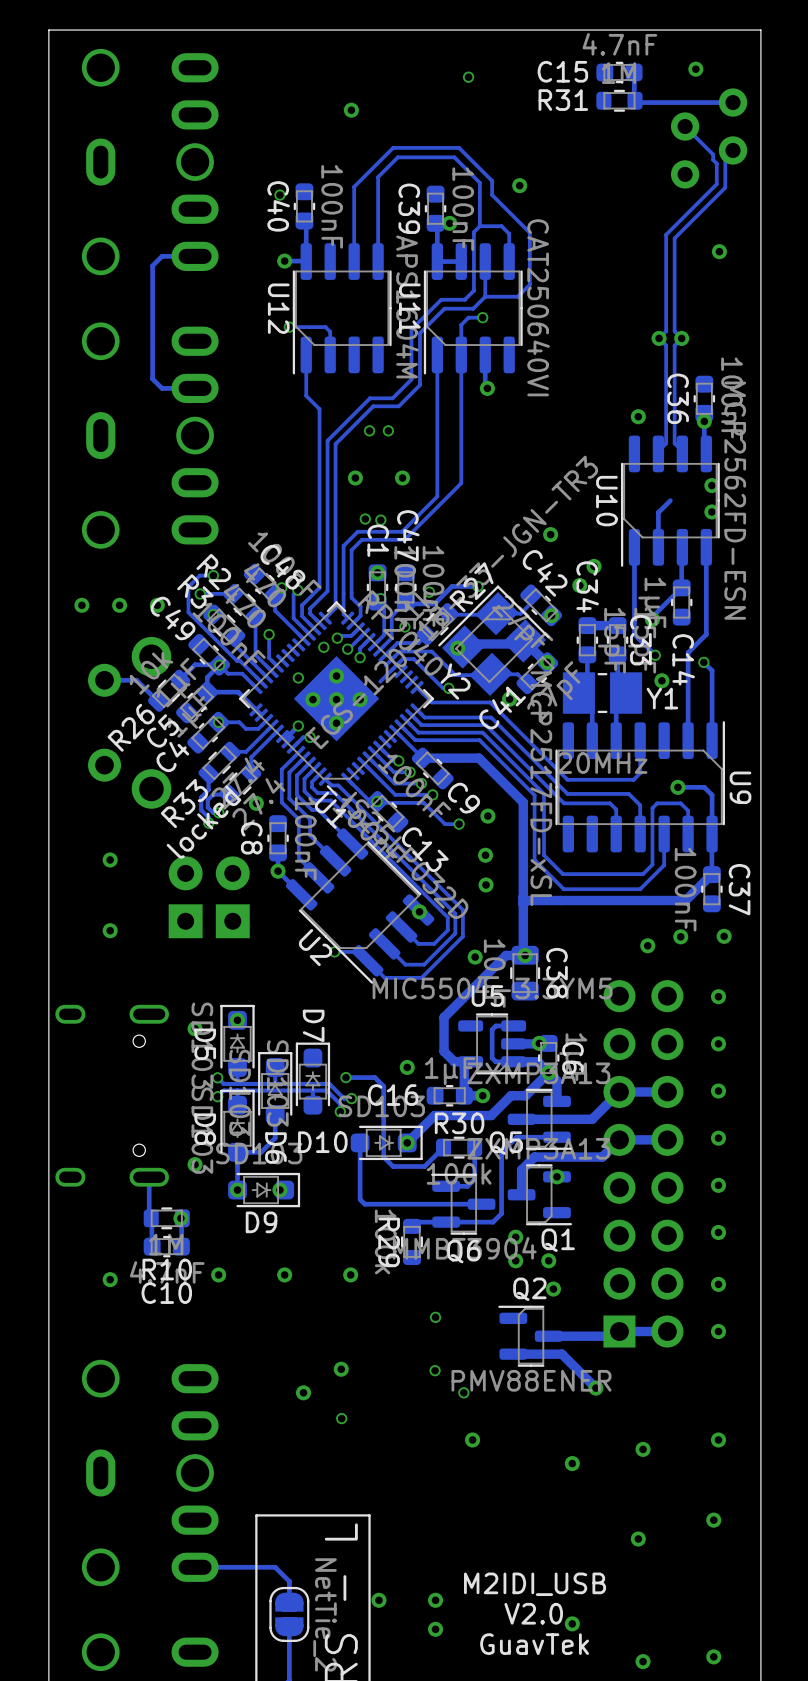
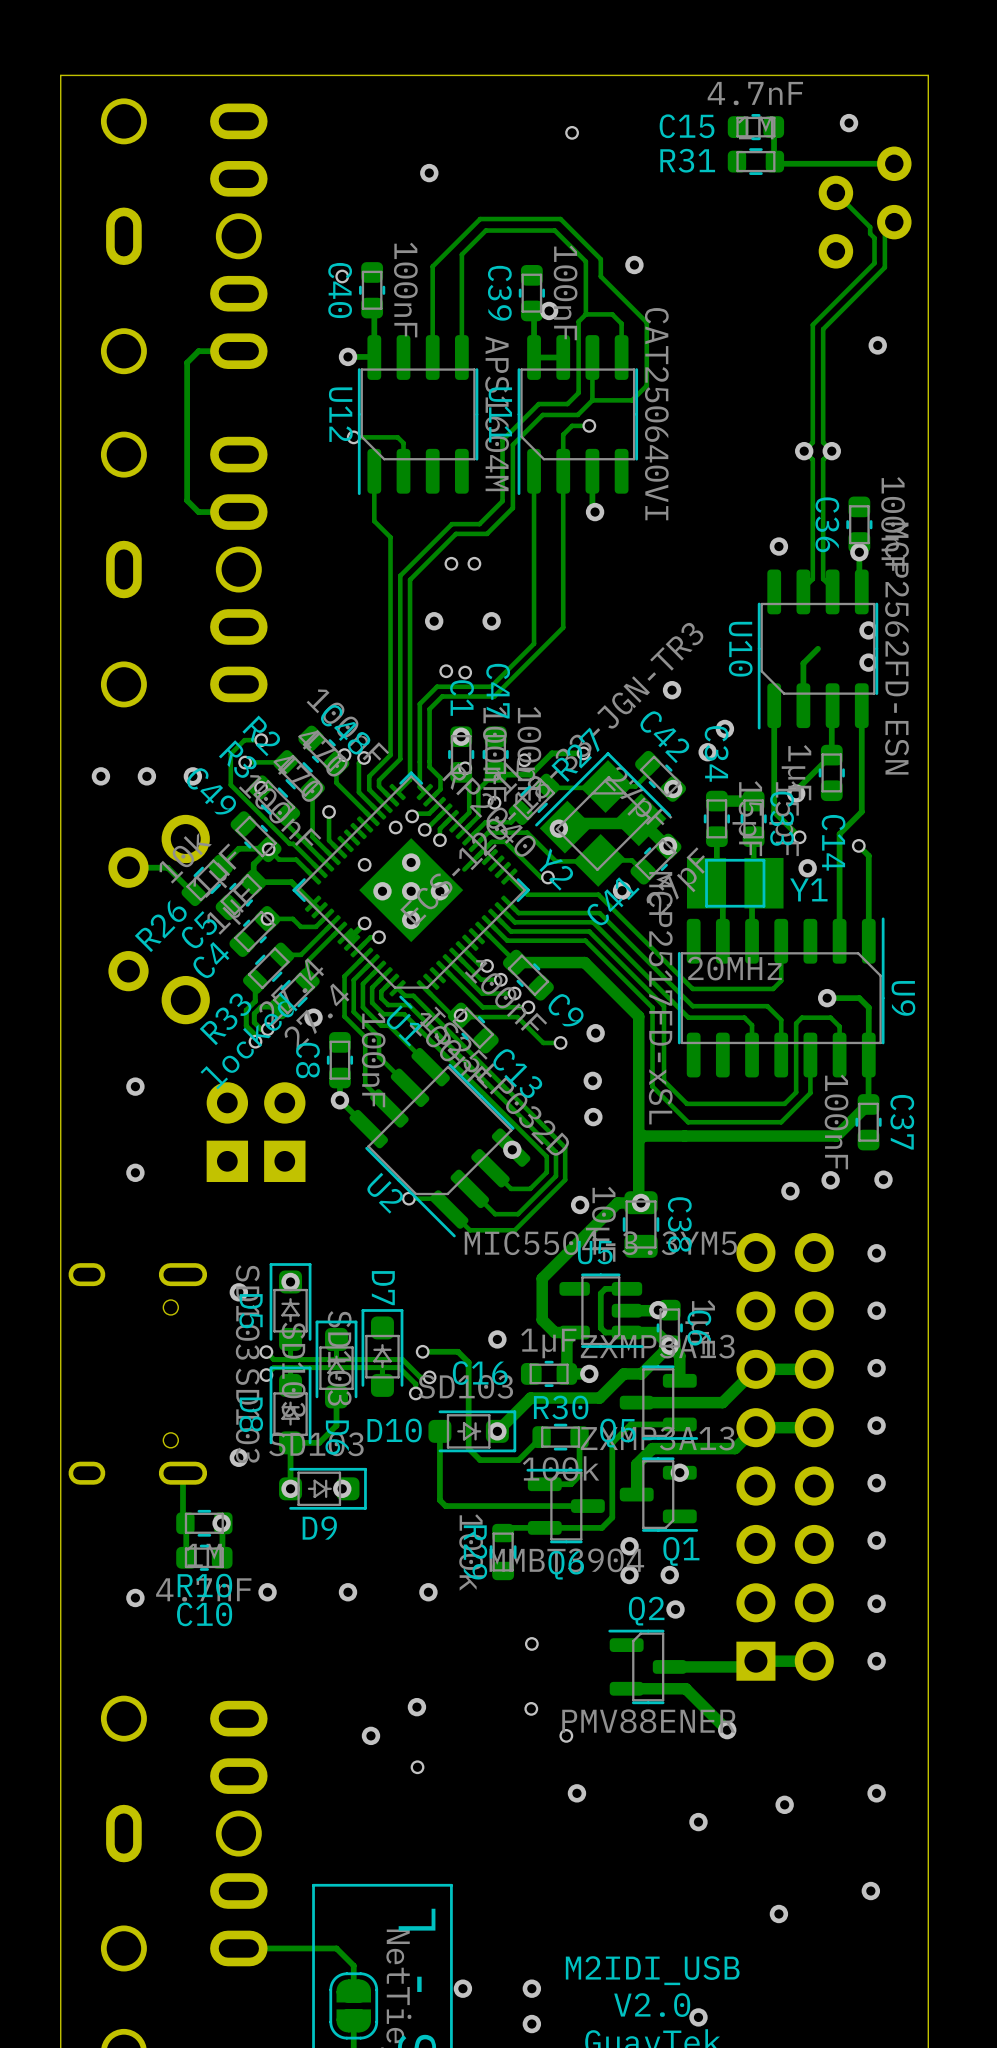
Y1 footprint: [562, 672, 643, 714] -> [686, 857, 784, 909]

